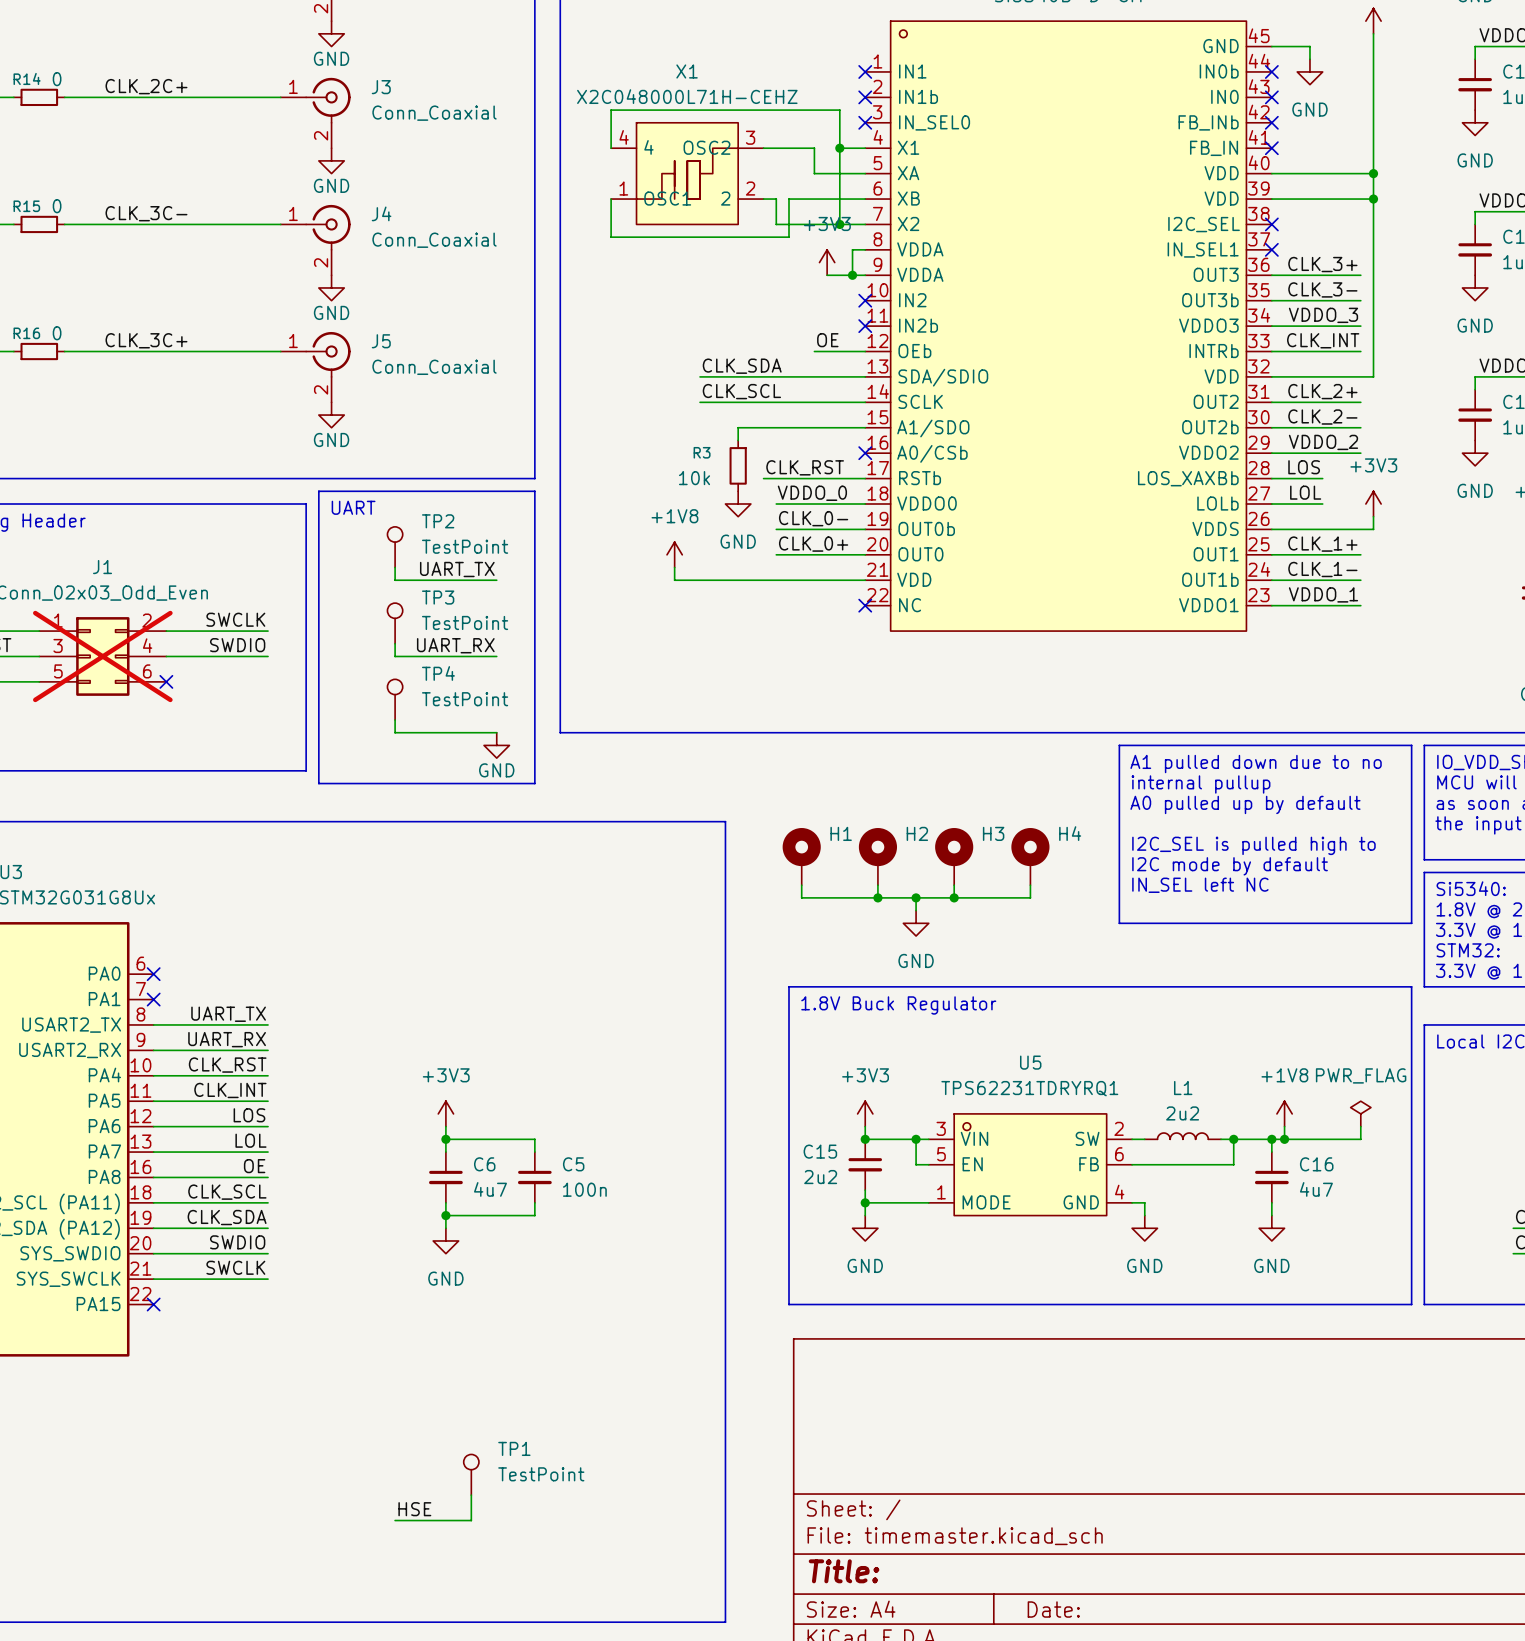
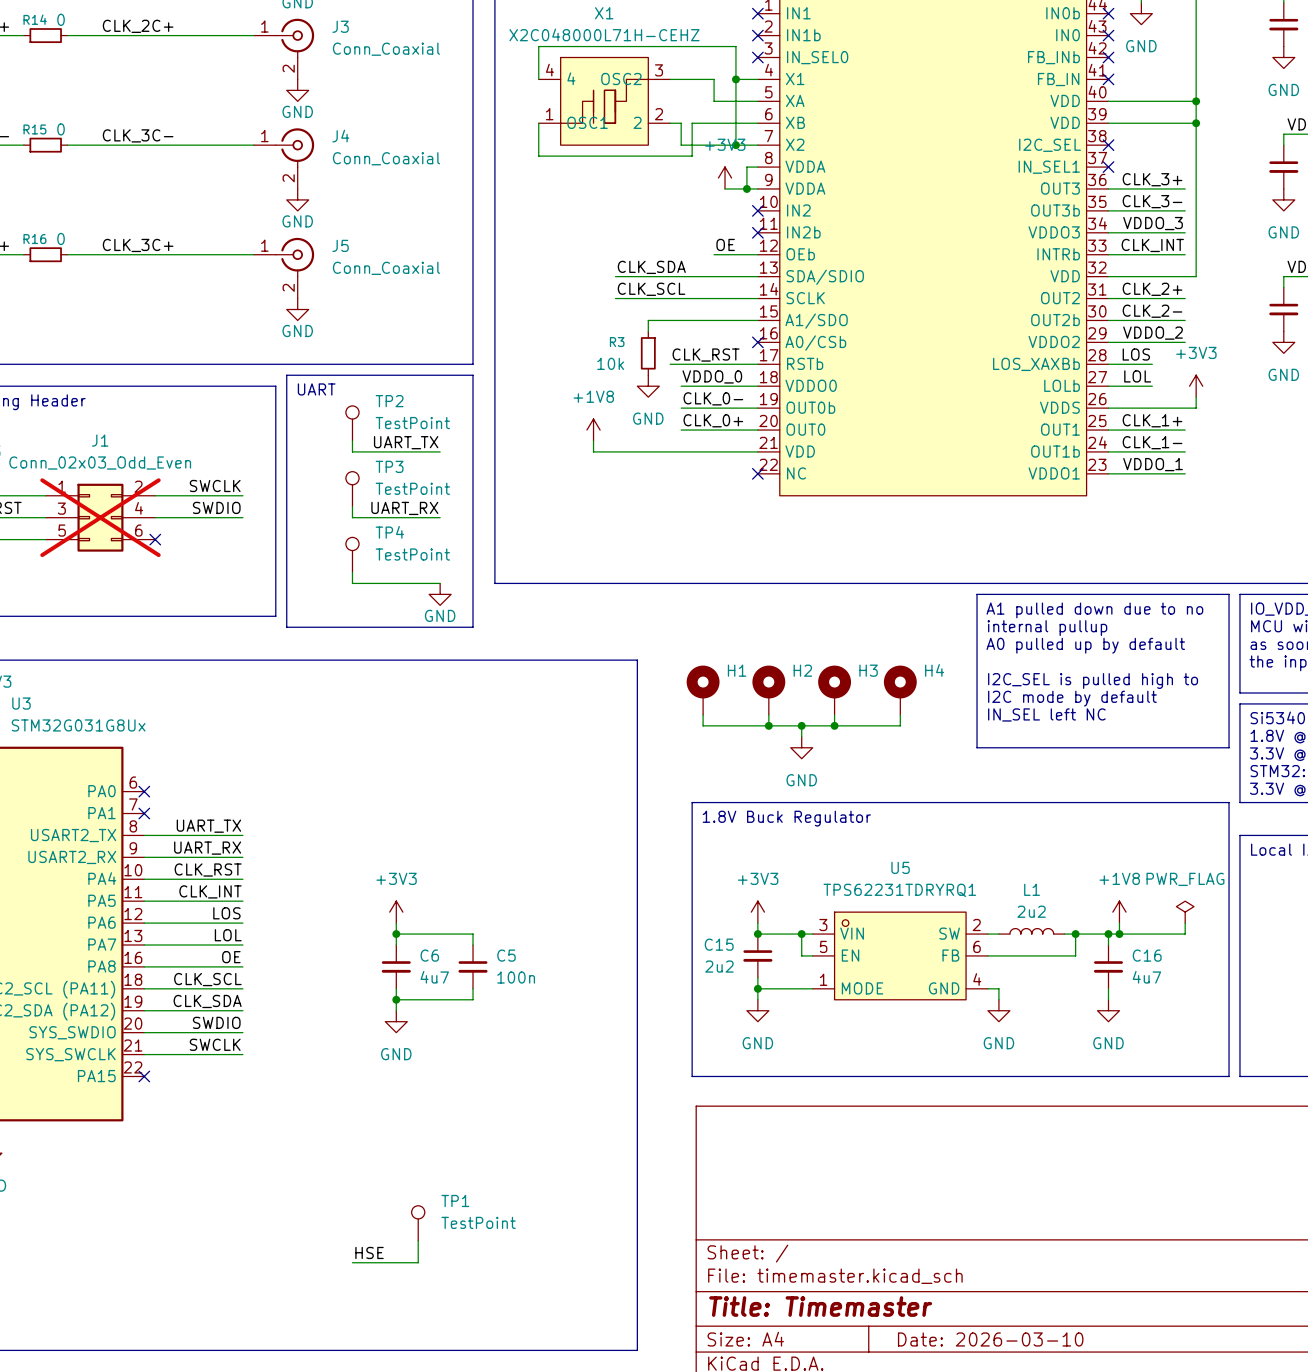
title block: Title: (844, 1571) -> Title: Timemaster (820, 1306)
title block: Date: (1053, 1609) -> Date: 2026-03-10 (990, 1339)

